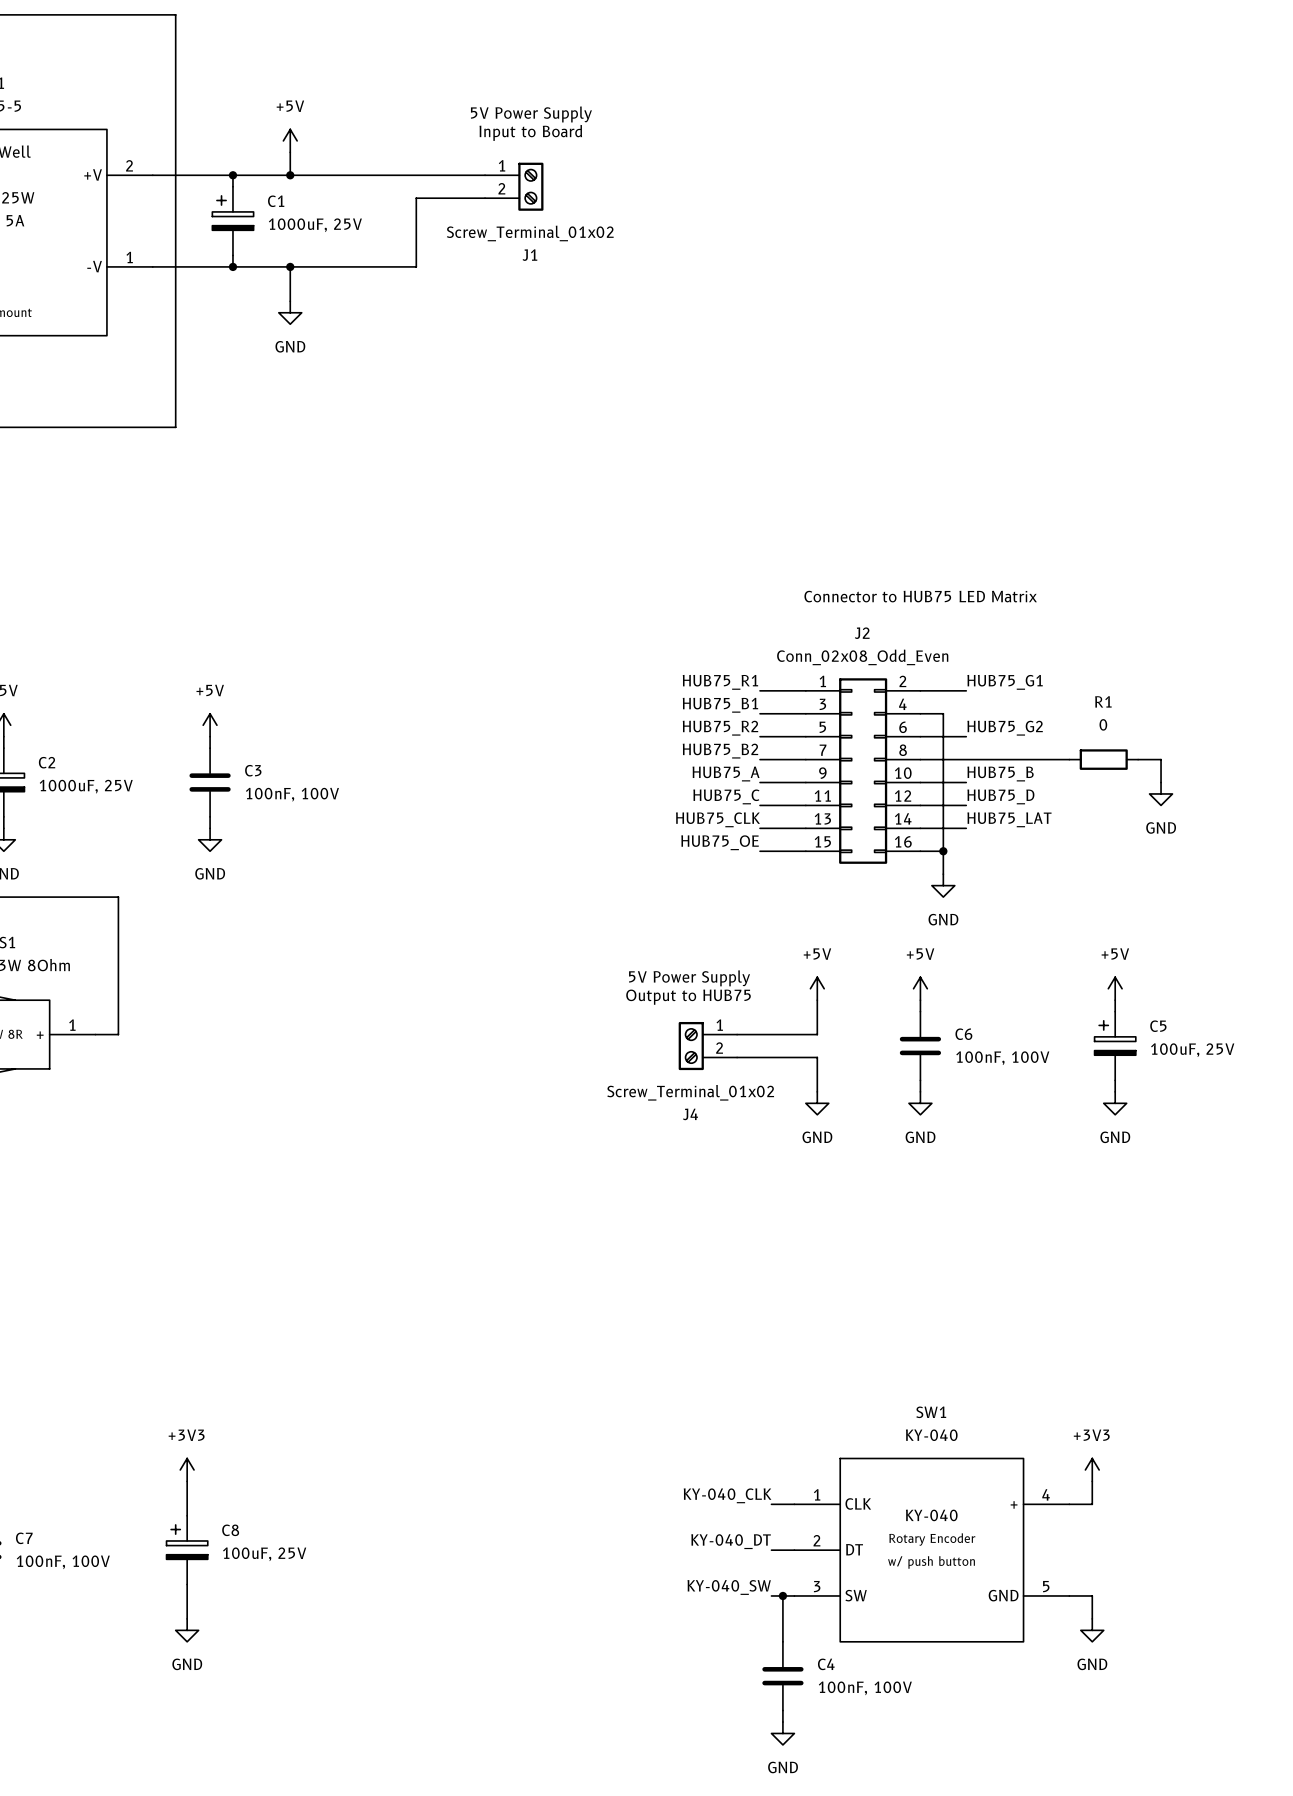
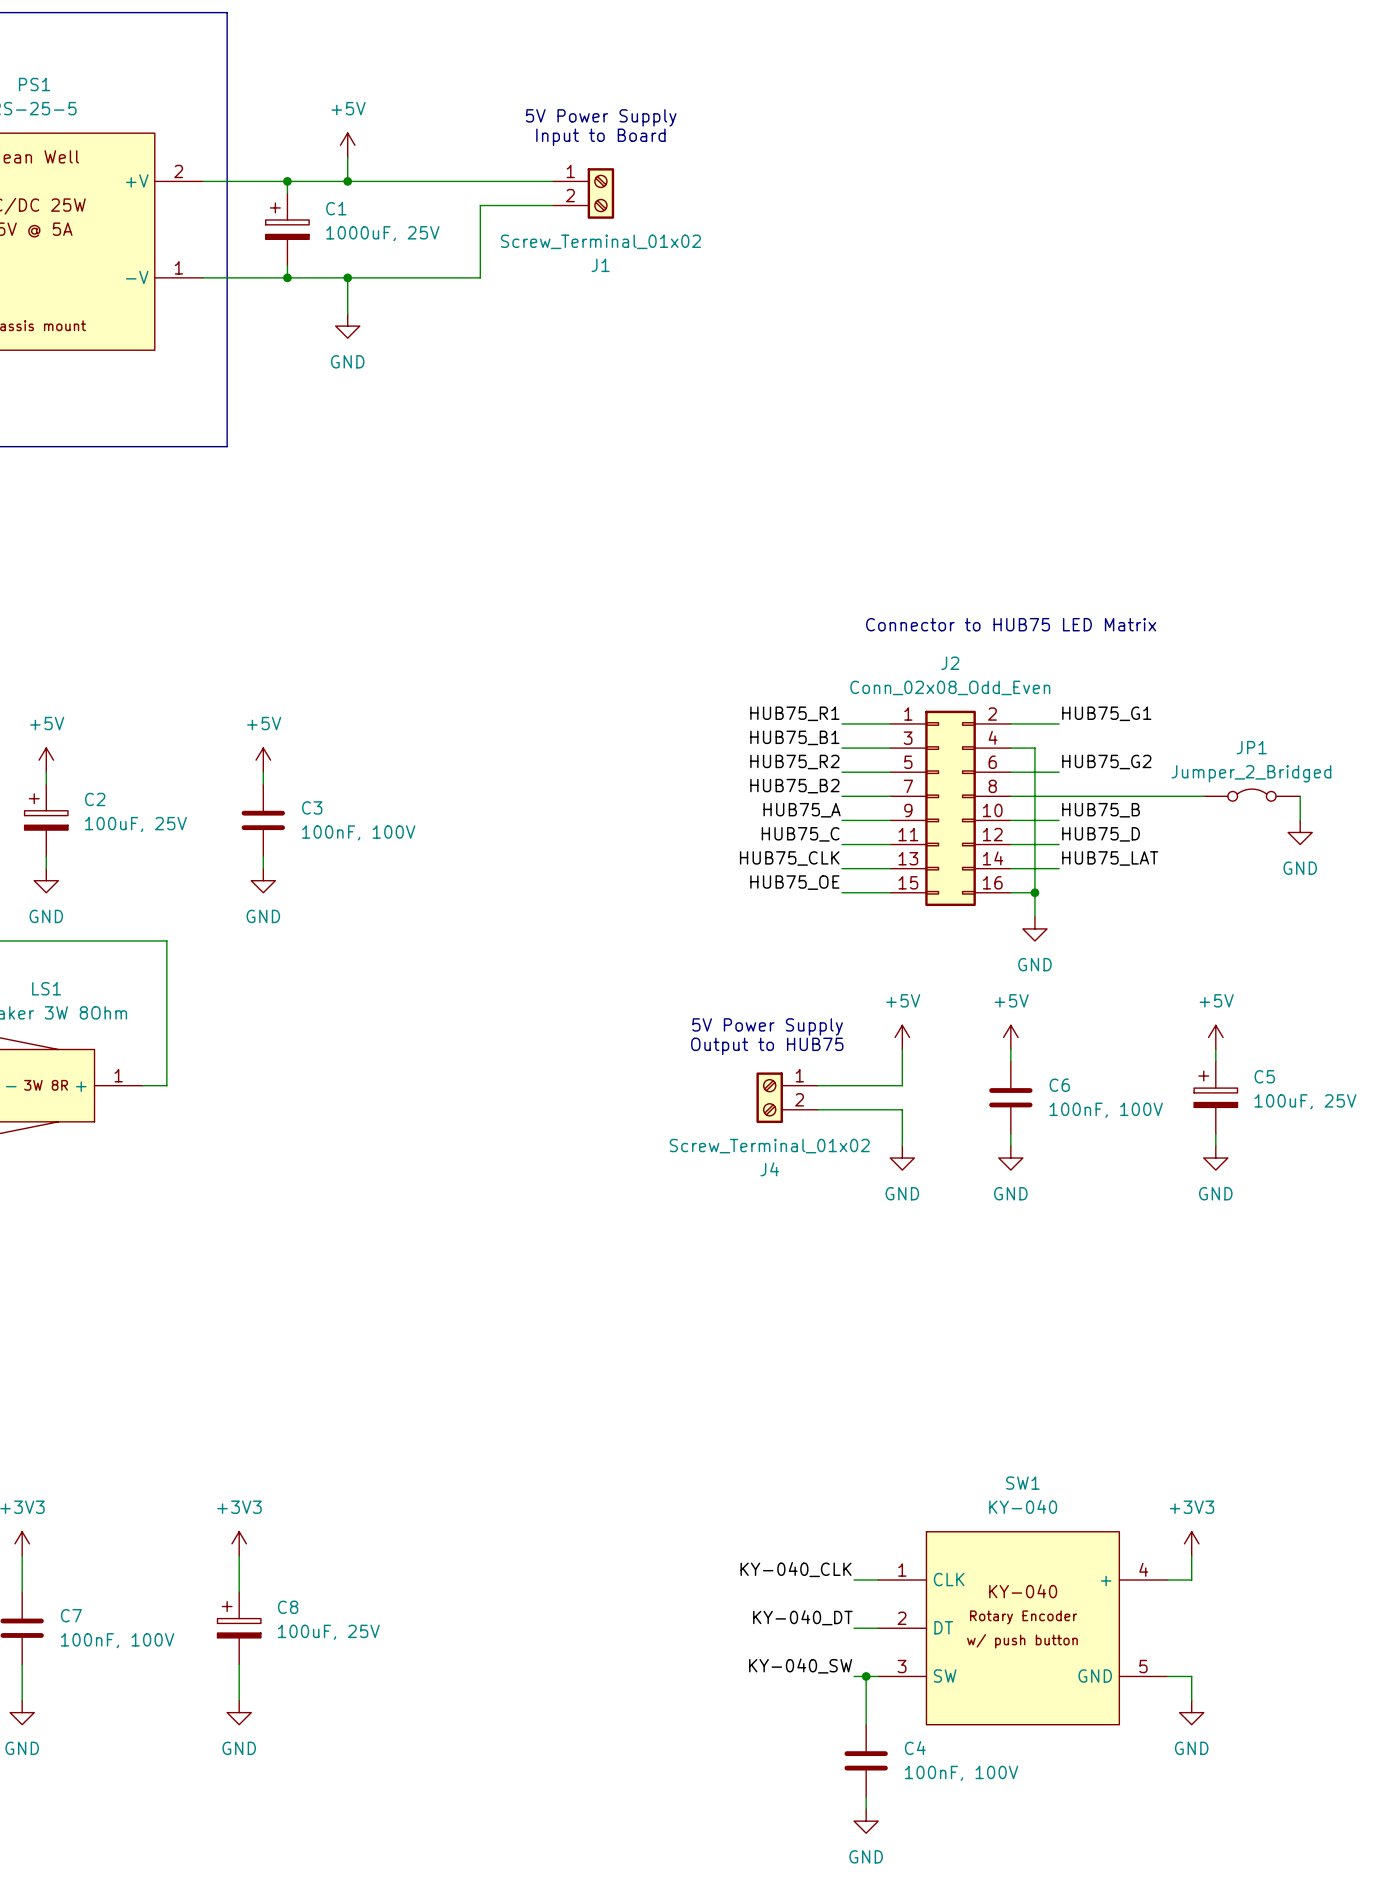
JP1: none -> Jumper_2_Bridged (1251, 795)
wire: none -> (1167, 796) (1203, 796)
R1: 0 (1103, 759) -> none
wire: (1138, 759) (1161, 759) (1161, 782) -> none
wire: none -> (1300, 796) (1300, 820)
C2 value: 1000uF, 25V (86, 786) -> 100uF, 25V (135, 824)
power symbol position: GND (1161, 793) -> GND (1300, 832)

